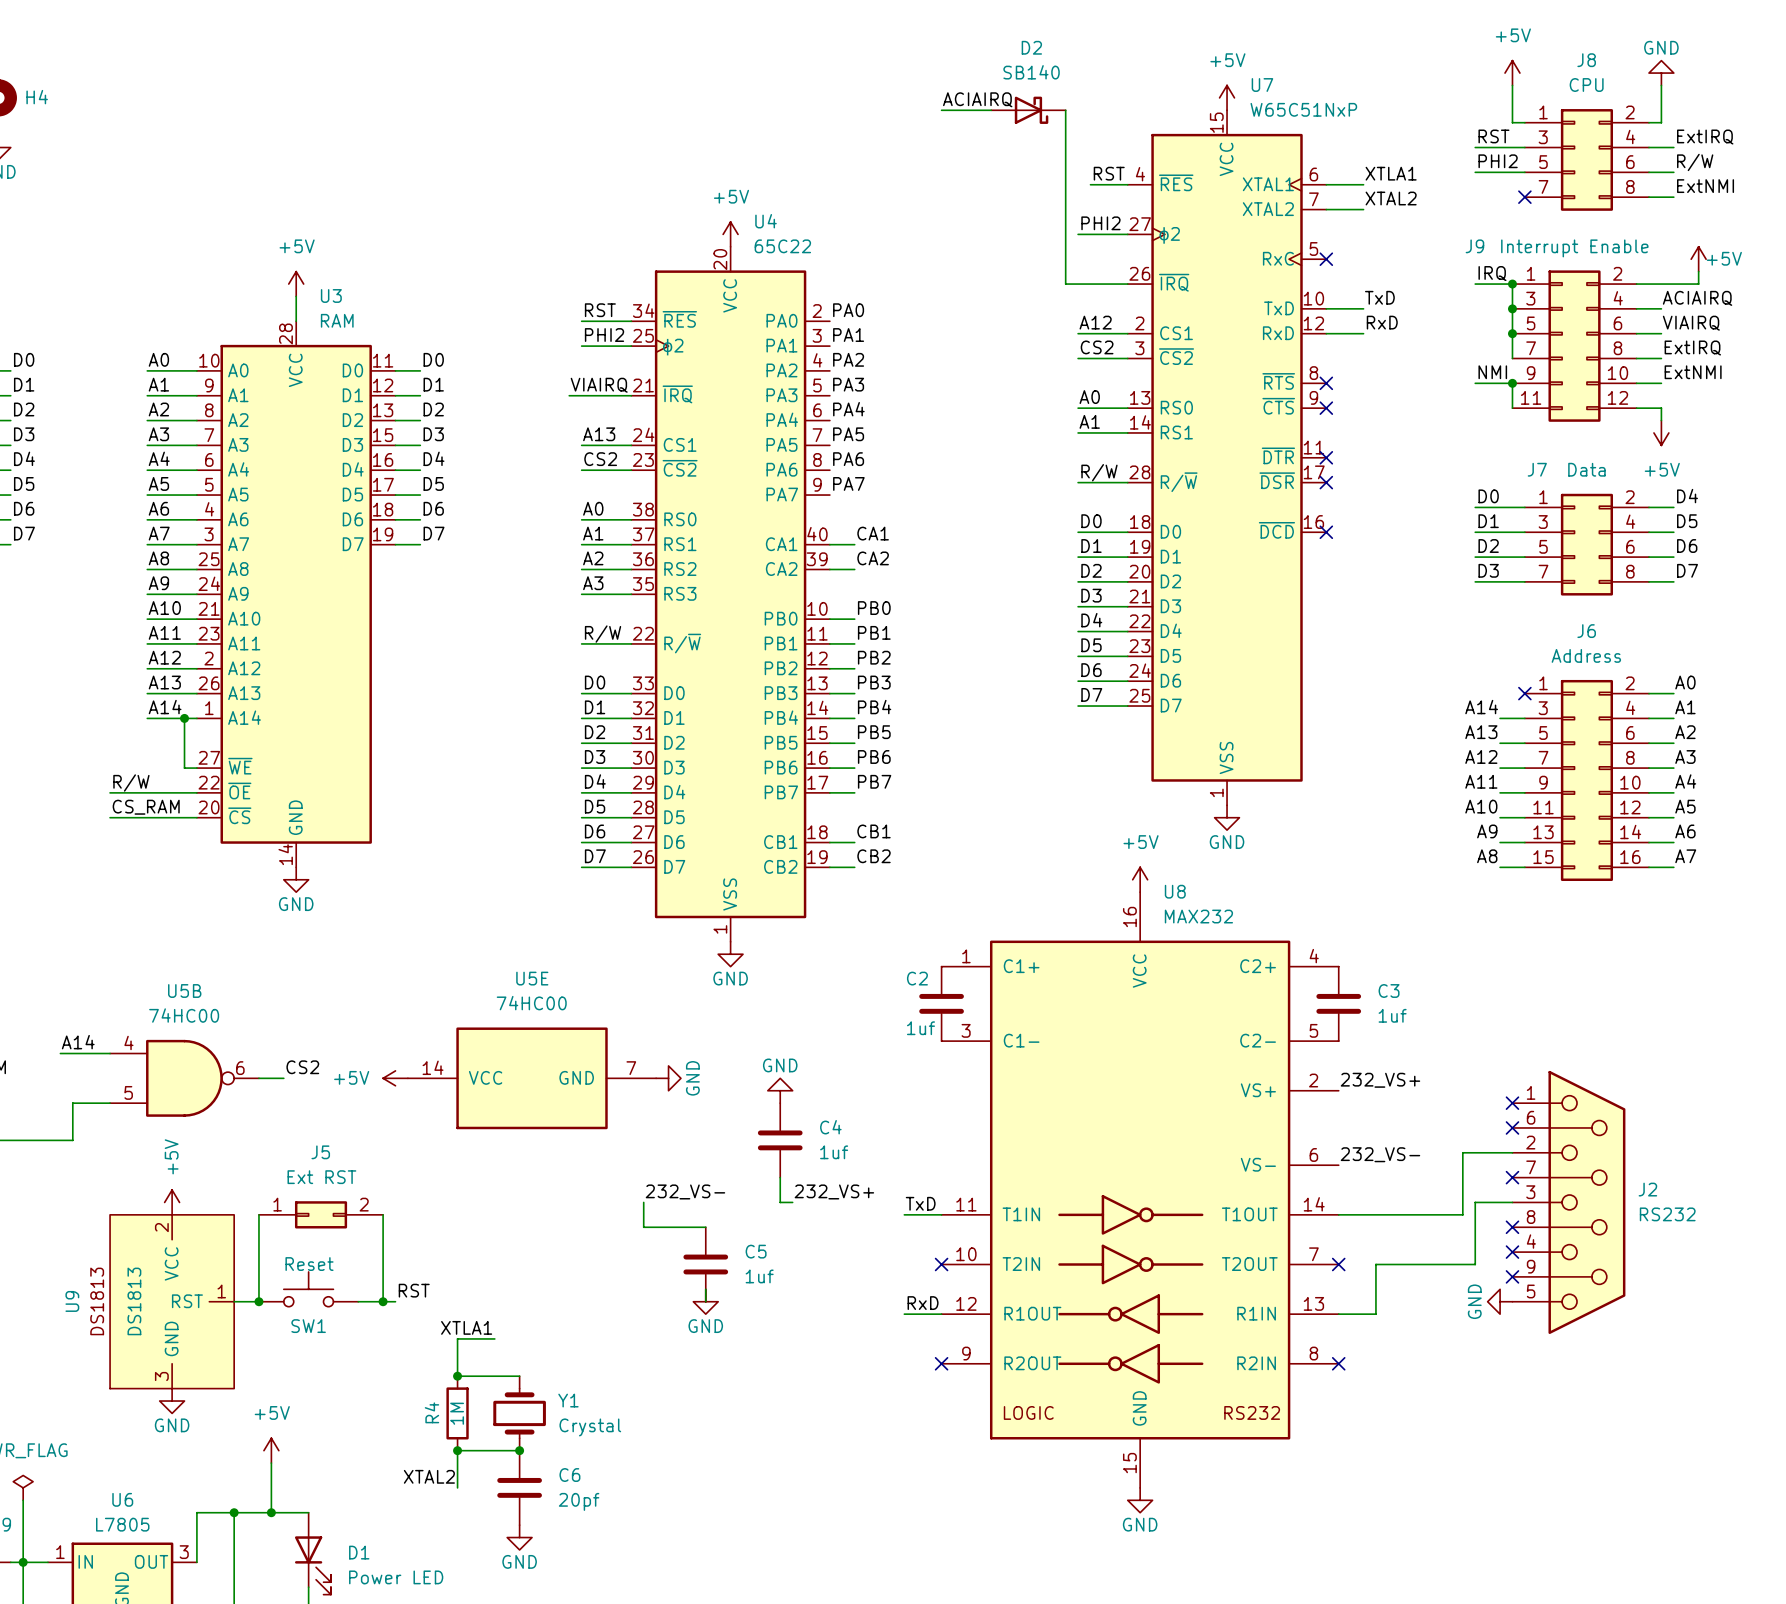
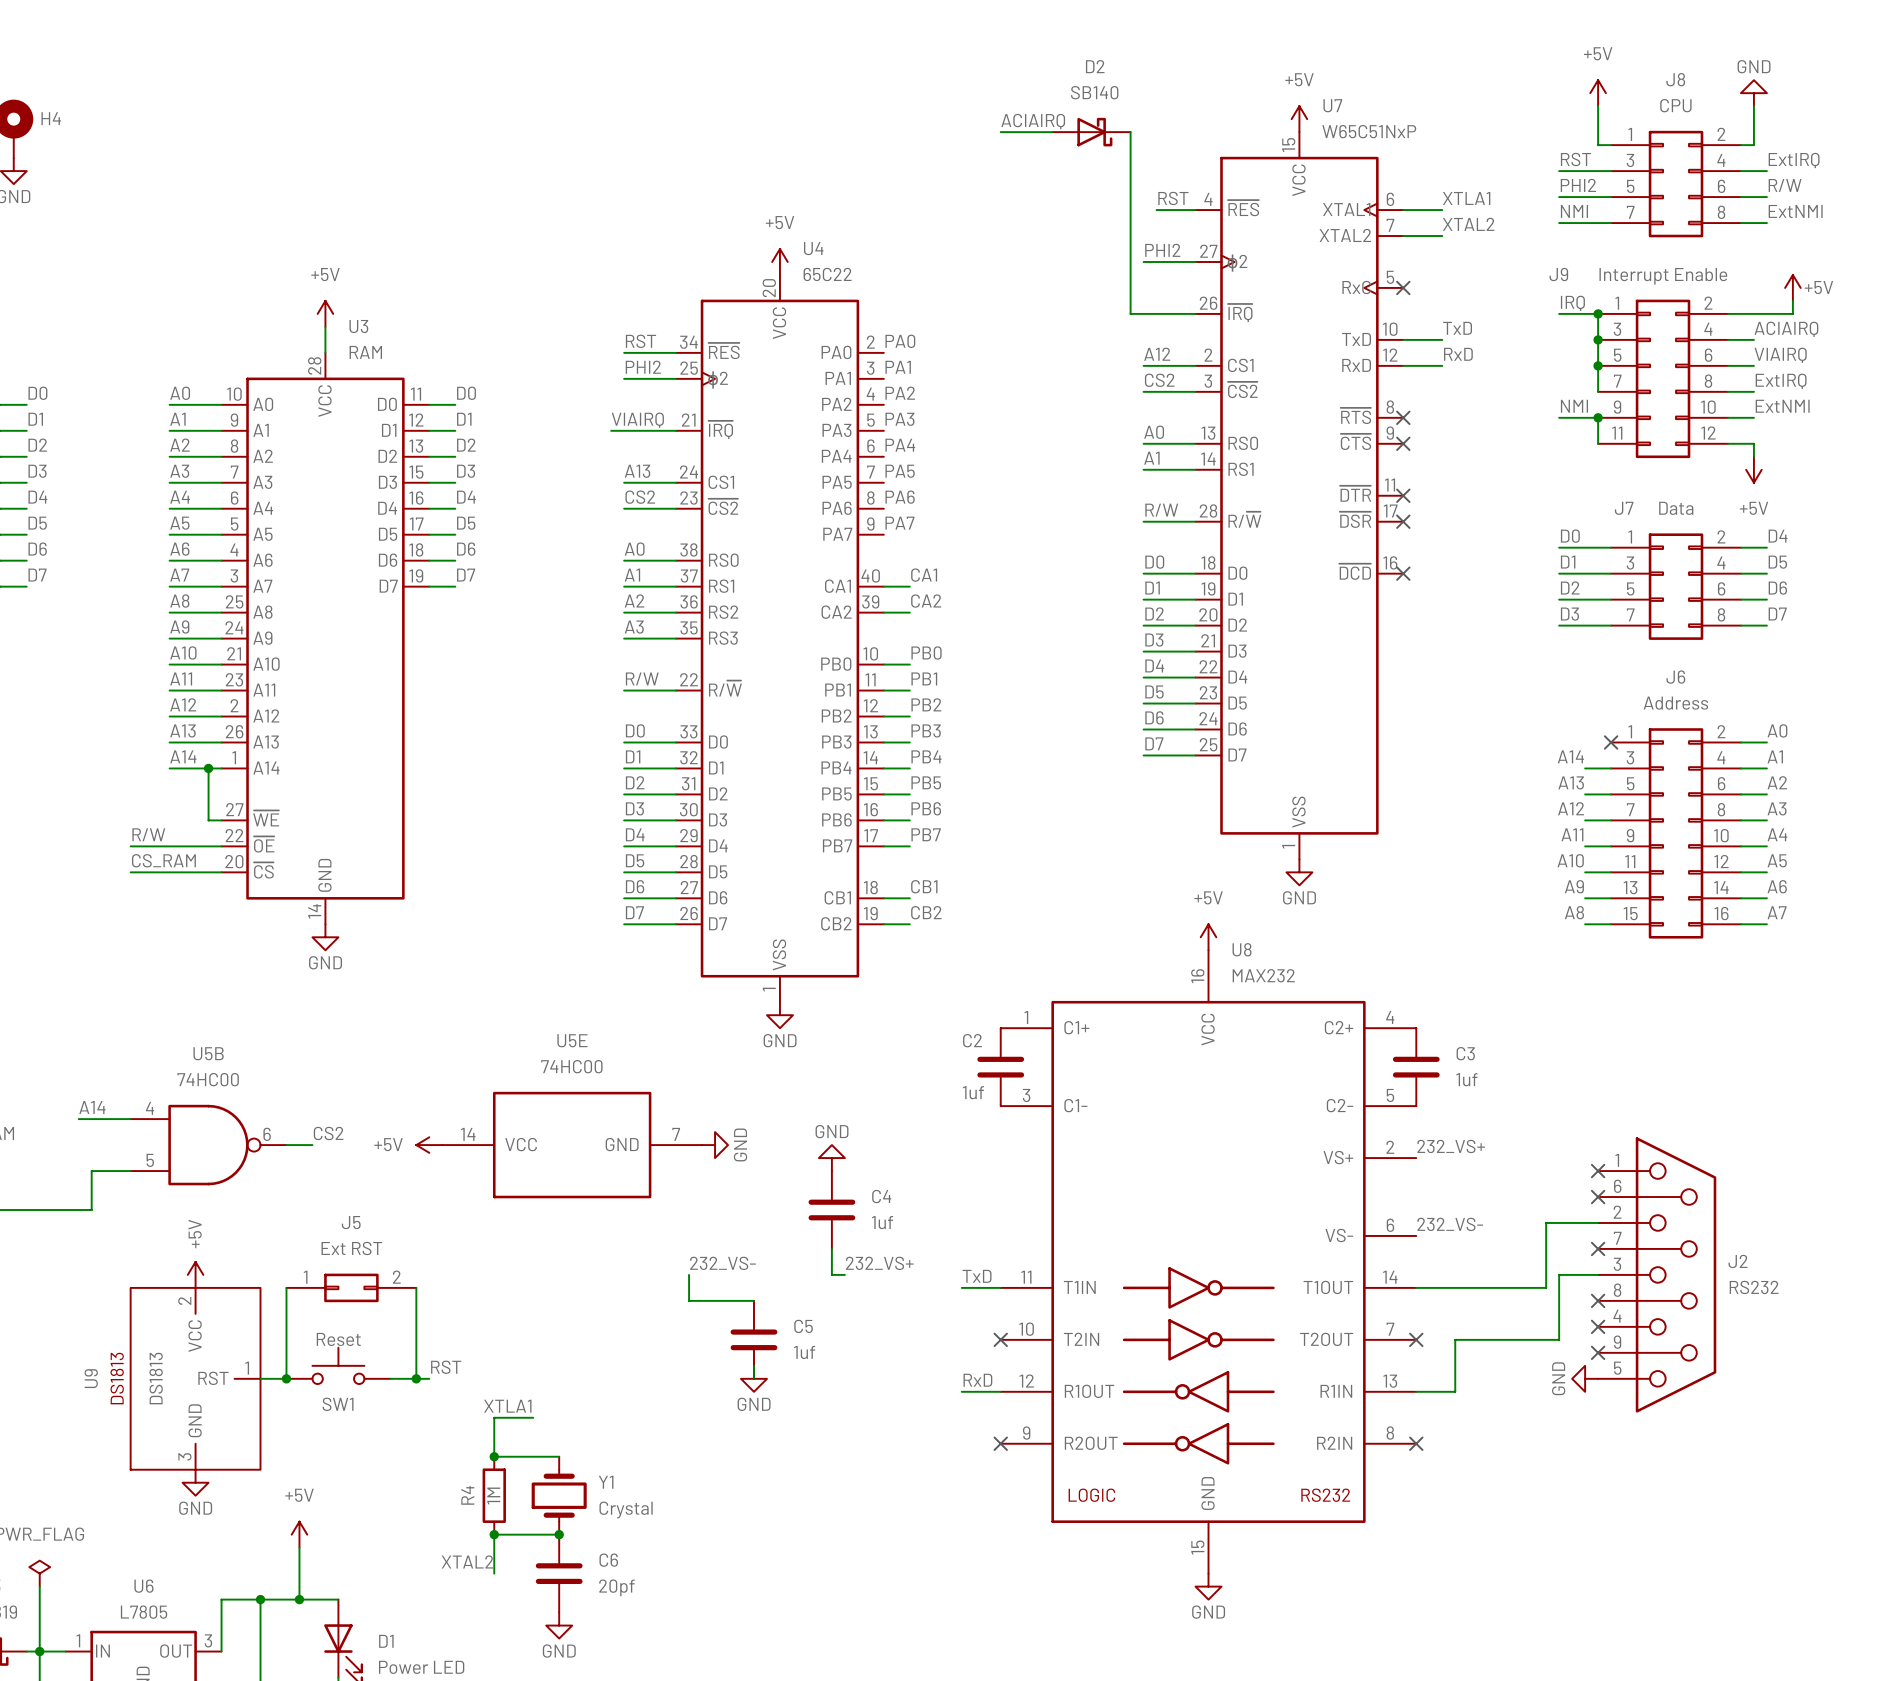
label: none -> NMI (1574, 211)
wire: none -> (1559, 223) (1611, 223)
no-connect mark: (1524, 197) -> none

